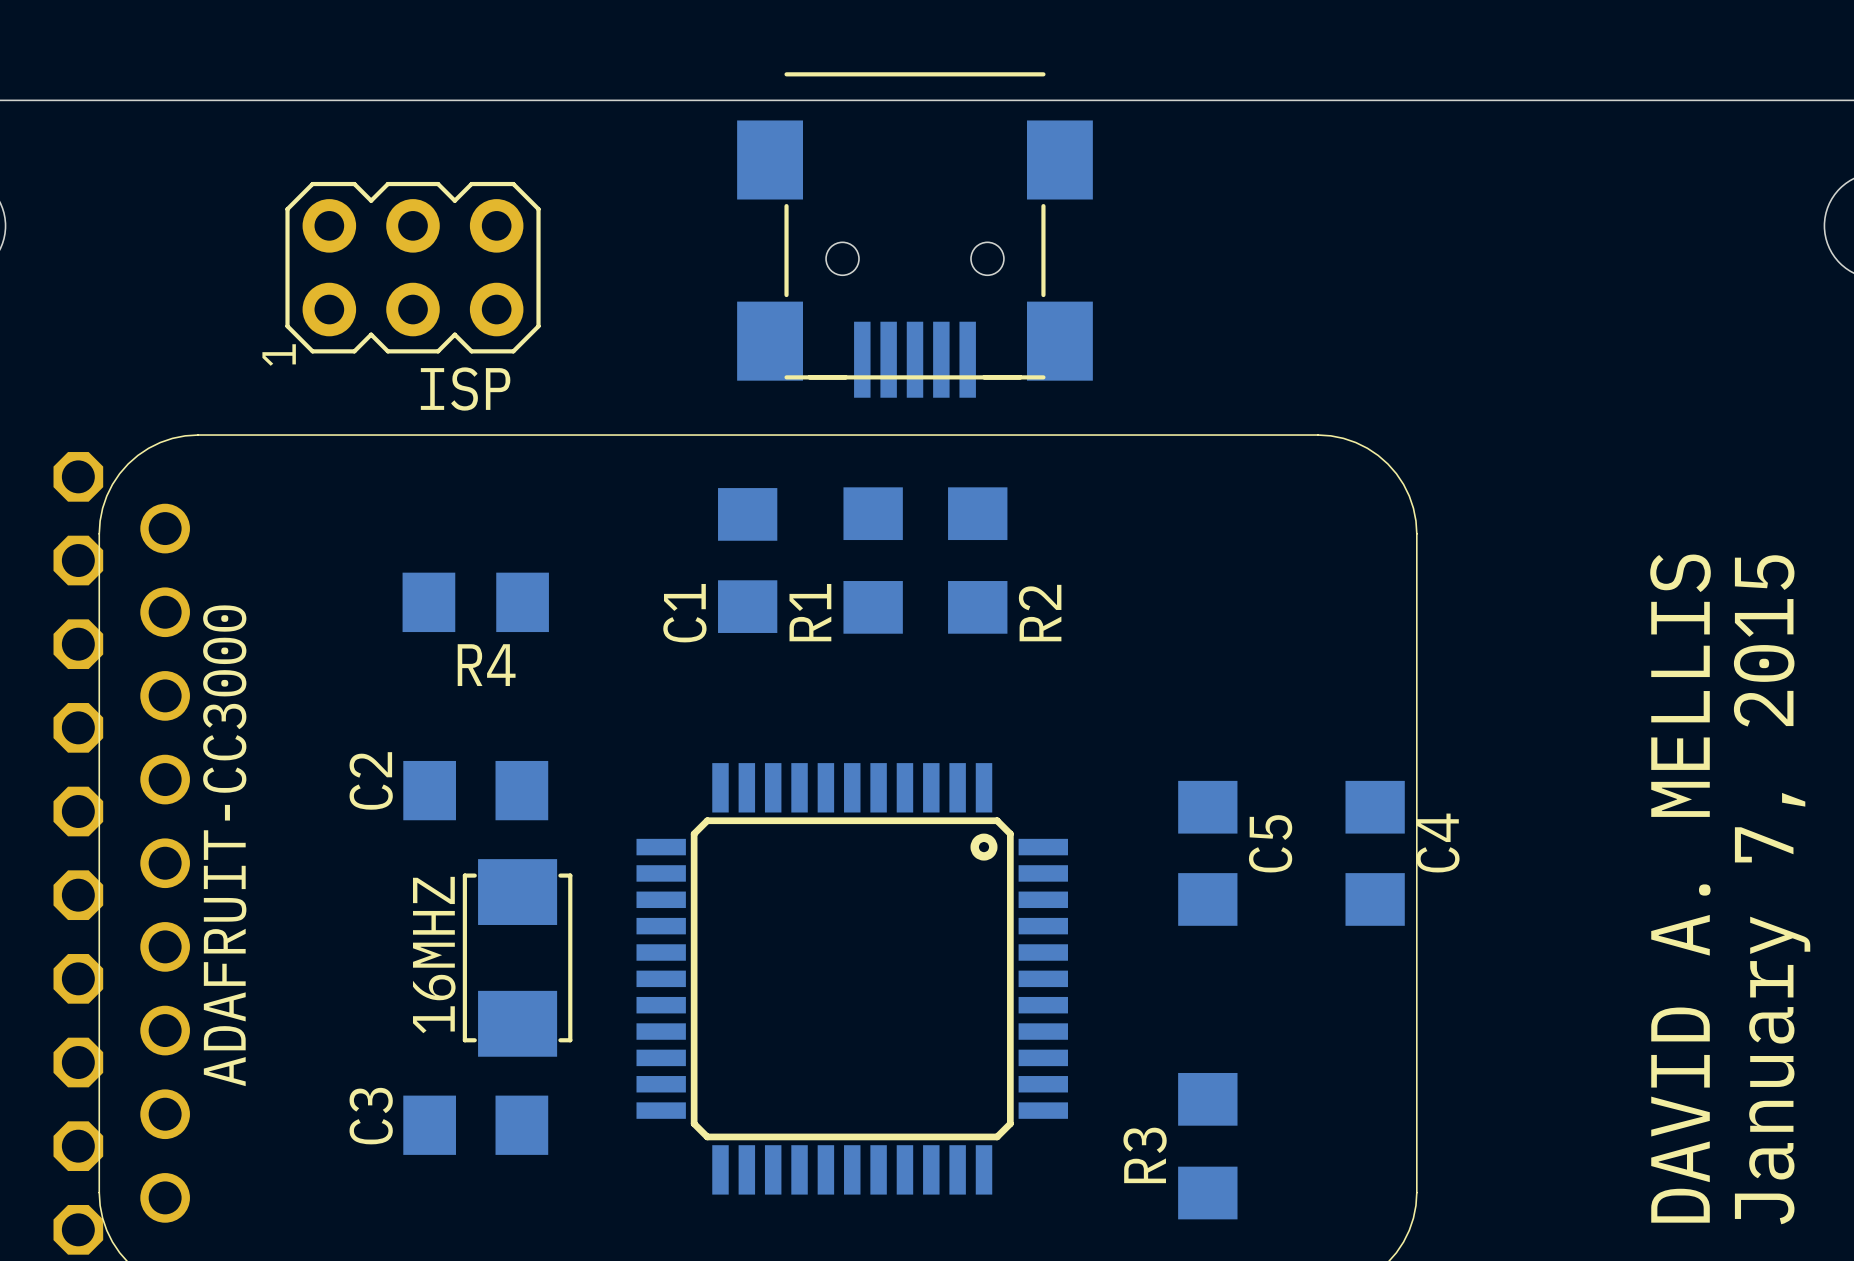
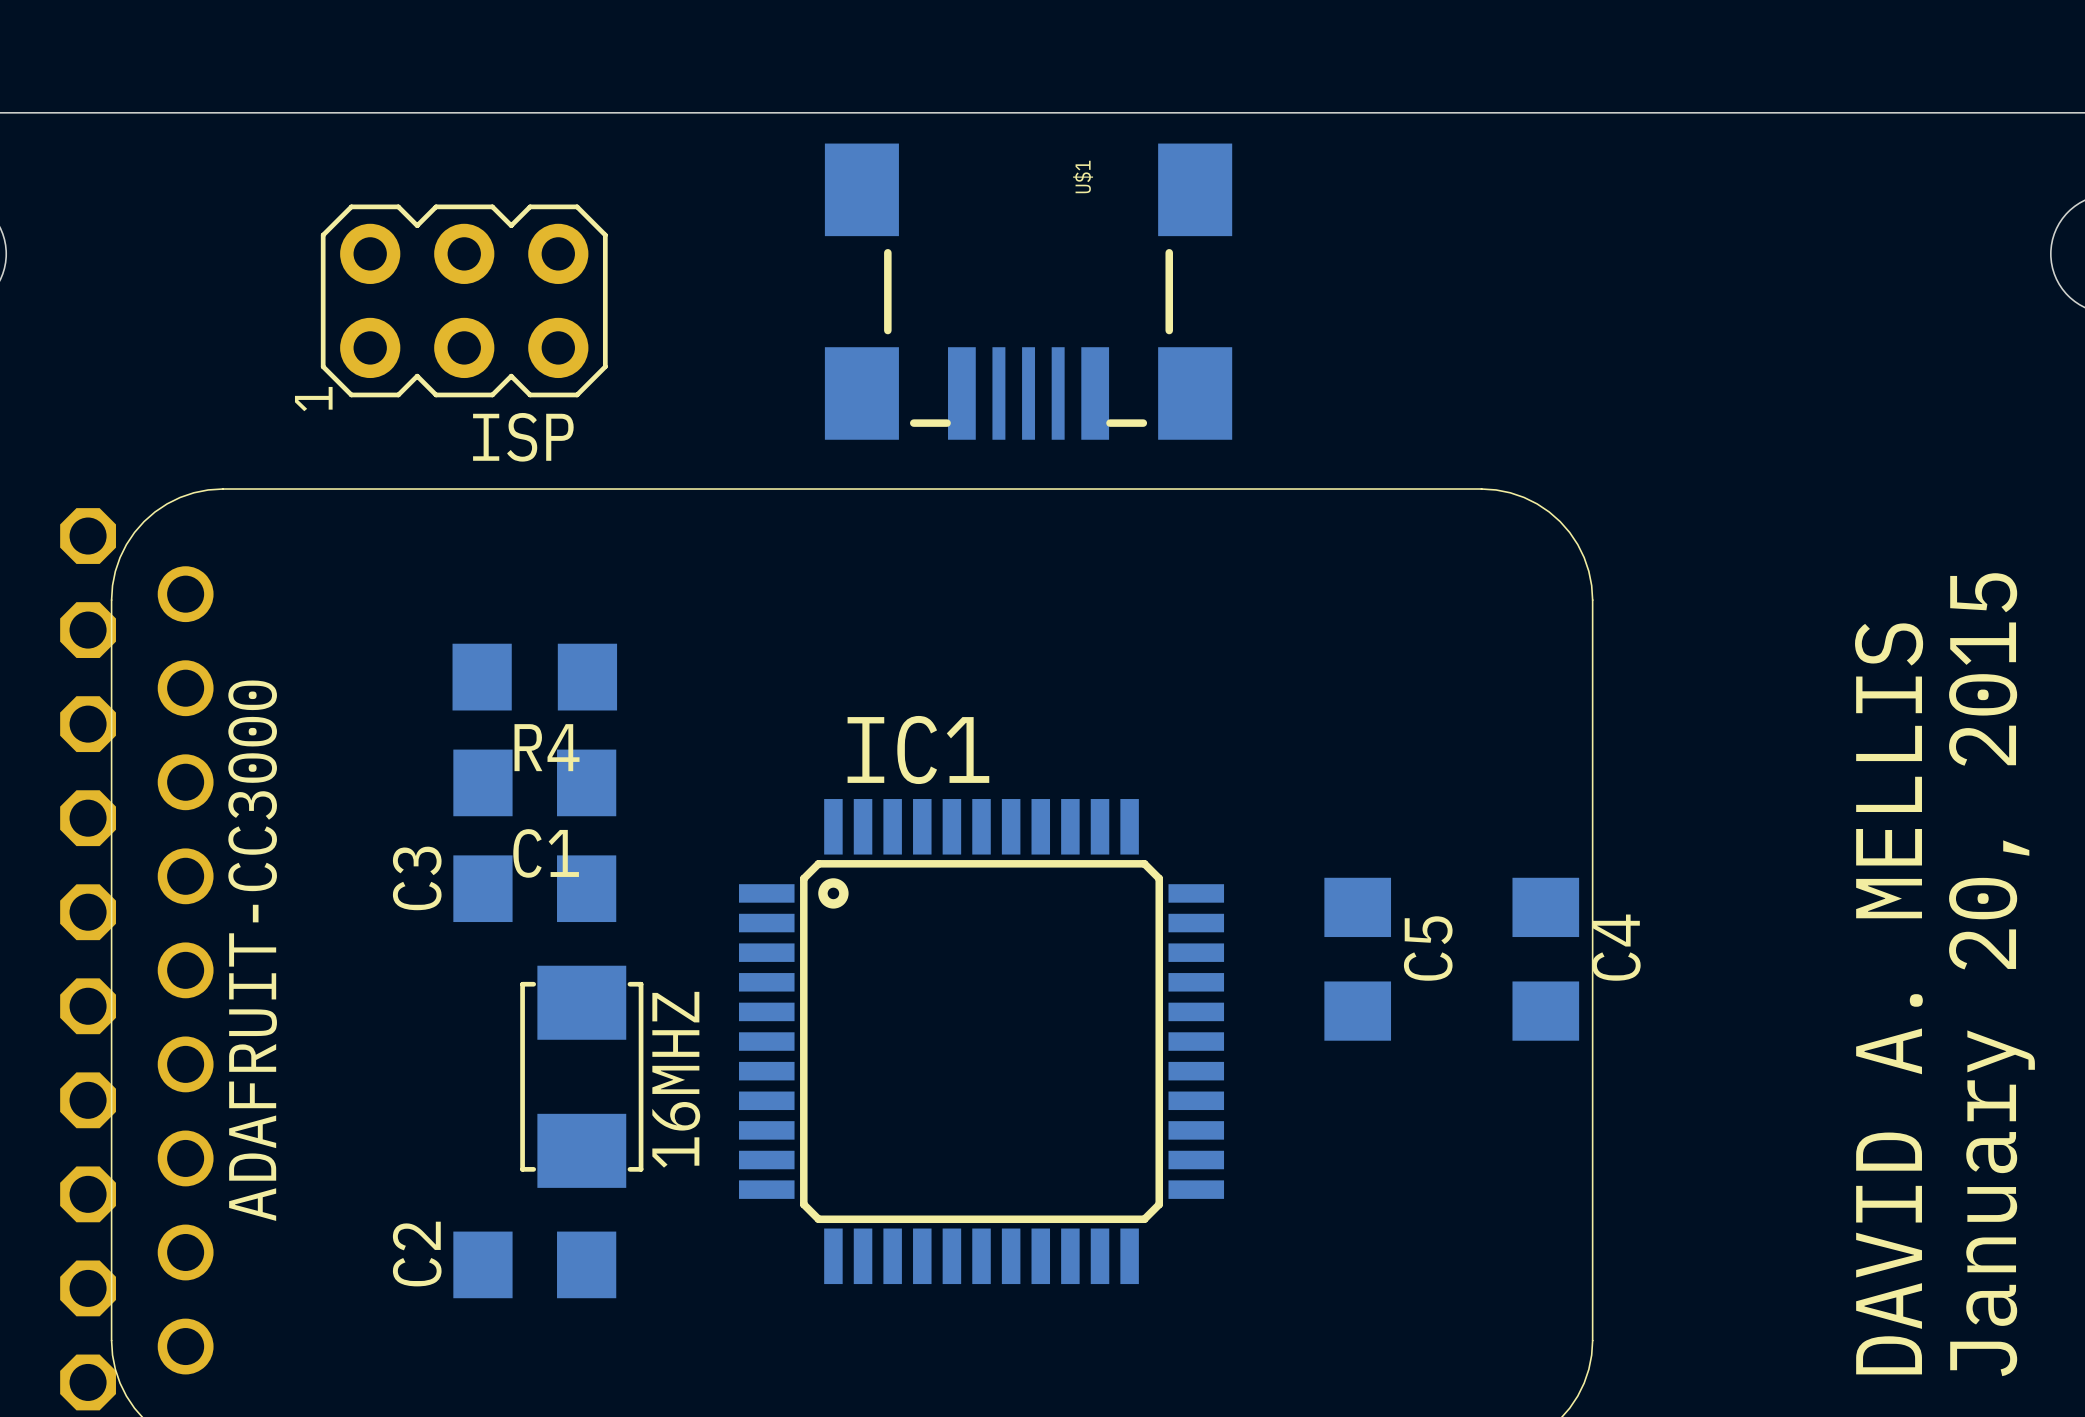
part: (914, 234) -> none
U$1: none -> (1028, 291)
C1 rotation: 0° (747, 560) -> 90° clockwise (534, 782)
C1 position: (747, 560) -> (534, 782)
R1: (873, 560) -> none
R2: (977, 560) -> none
C2 name: C2 (371, 780) -> C3 (417, 878)
text: January 7, 2015 (1772, 889) -> January 20, 2015 (1991, 974)
IC1: none -> (981, 1041)
16MHZ name position: 16MHZ (434, 955) -> 16MHZ (676, 1079)
part: (852, 978) -> none
C3 name: C3 (371, 1116) -> C2 (417, 1254)
R3: (1207, 1146) -> none

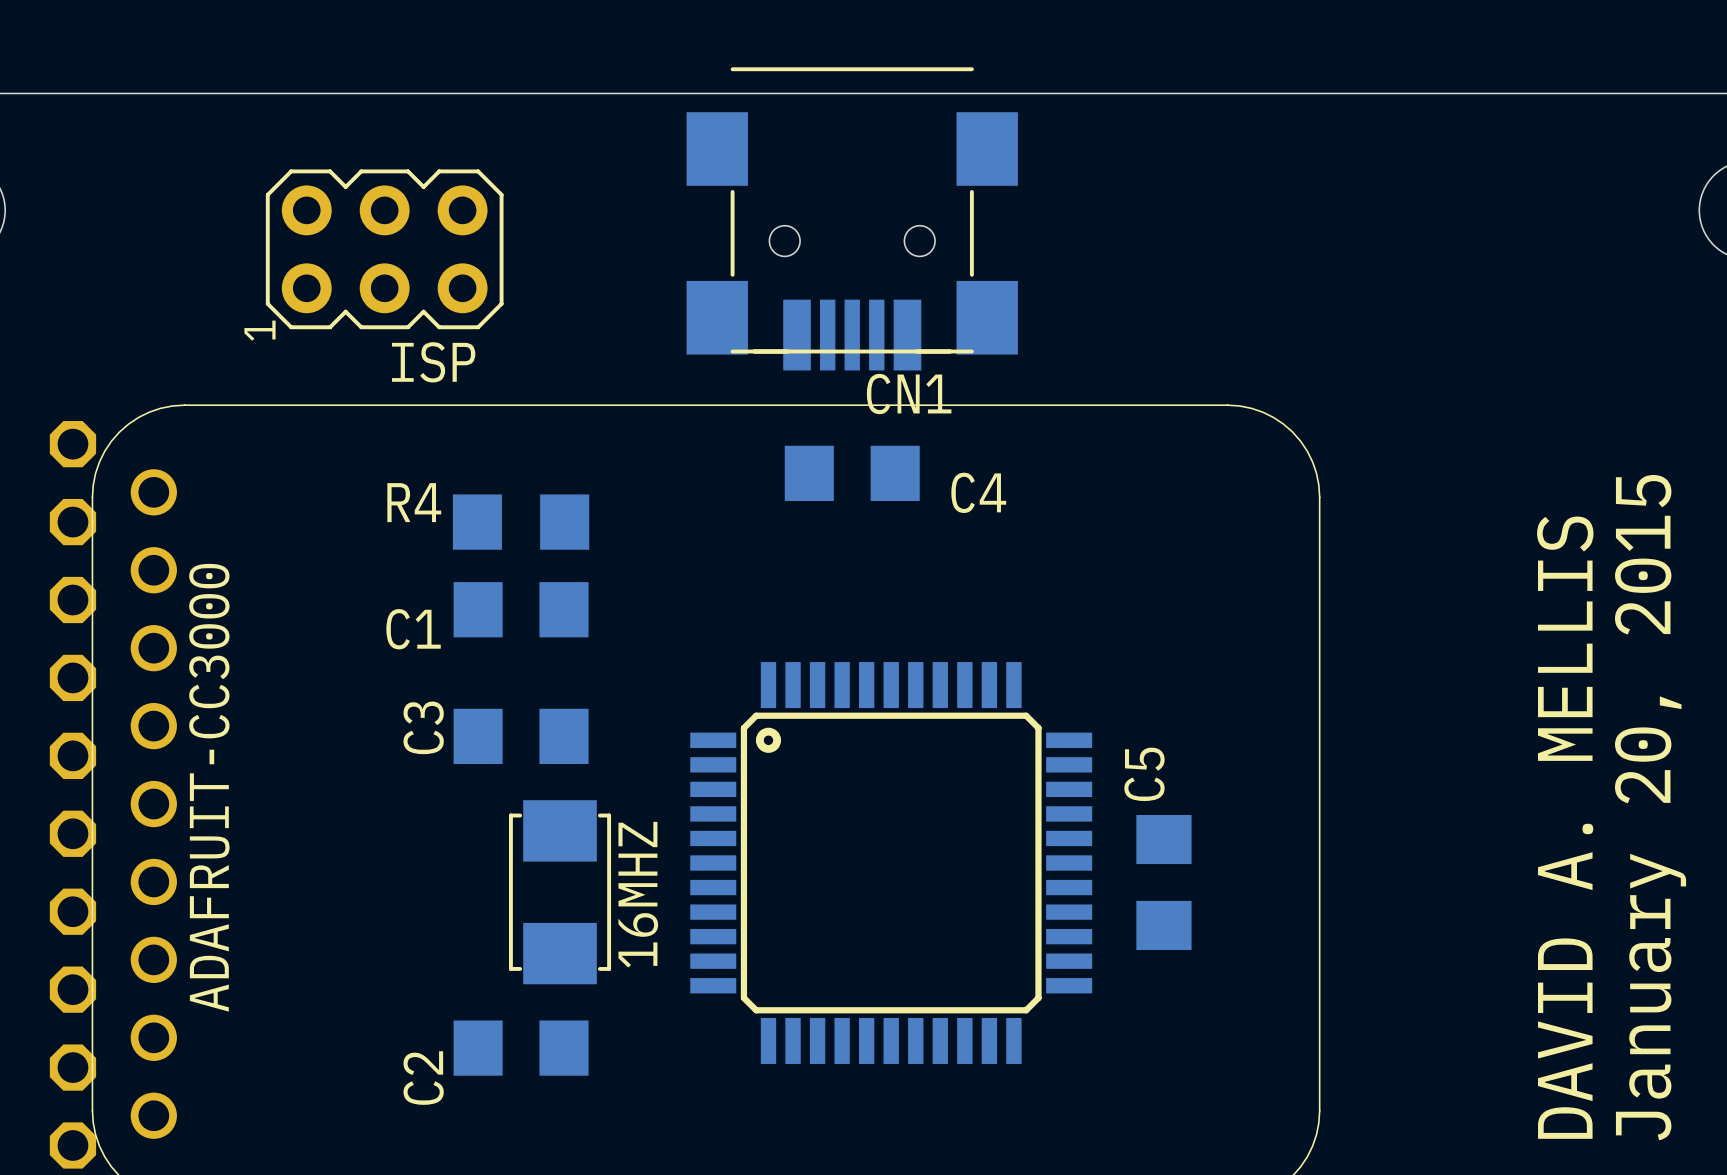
CN1: none -> (852, 218)
U$1: (1028, 291) -> none
R4 position: (534, 677) -> (521, 522)
R4 name position: R4 (547, 747) -> R4 (414, 502)
C1 position: (534, 782) -> (521, 609)
C1 name position: C1 (546, 853) -> C1 (413, 629)
C3 position: (534, 888) -> (521, 736)
C5 name position: C5 (1428, 948) -> C5 (1144, 774)
C5 position: (1357, 959) -> (1163, 882)
C4 rotation: 0° (1545, 959) -> 90° clockwise (852, 473)
C4 position: (1545, 959) -> (852, 473)
IC1: (981, 1041) -> none
part: none -> (891, 863)
16MHZ position: (581, 1076) -> (560, 892)
C2 name position: C2 (417, 1254) -> C2 (423, 1078)
C2 position: (534, 1264) -> (521, 1048)

